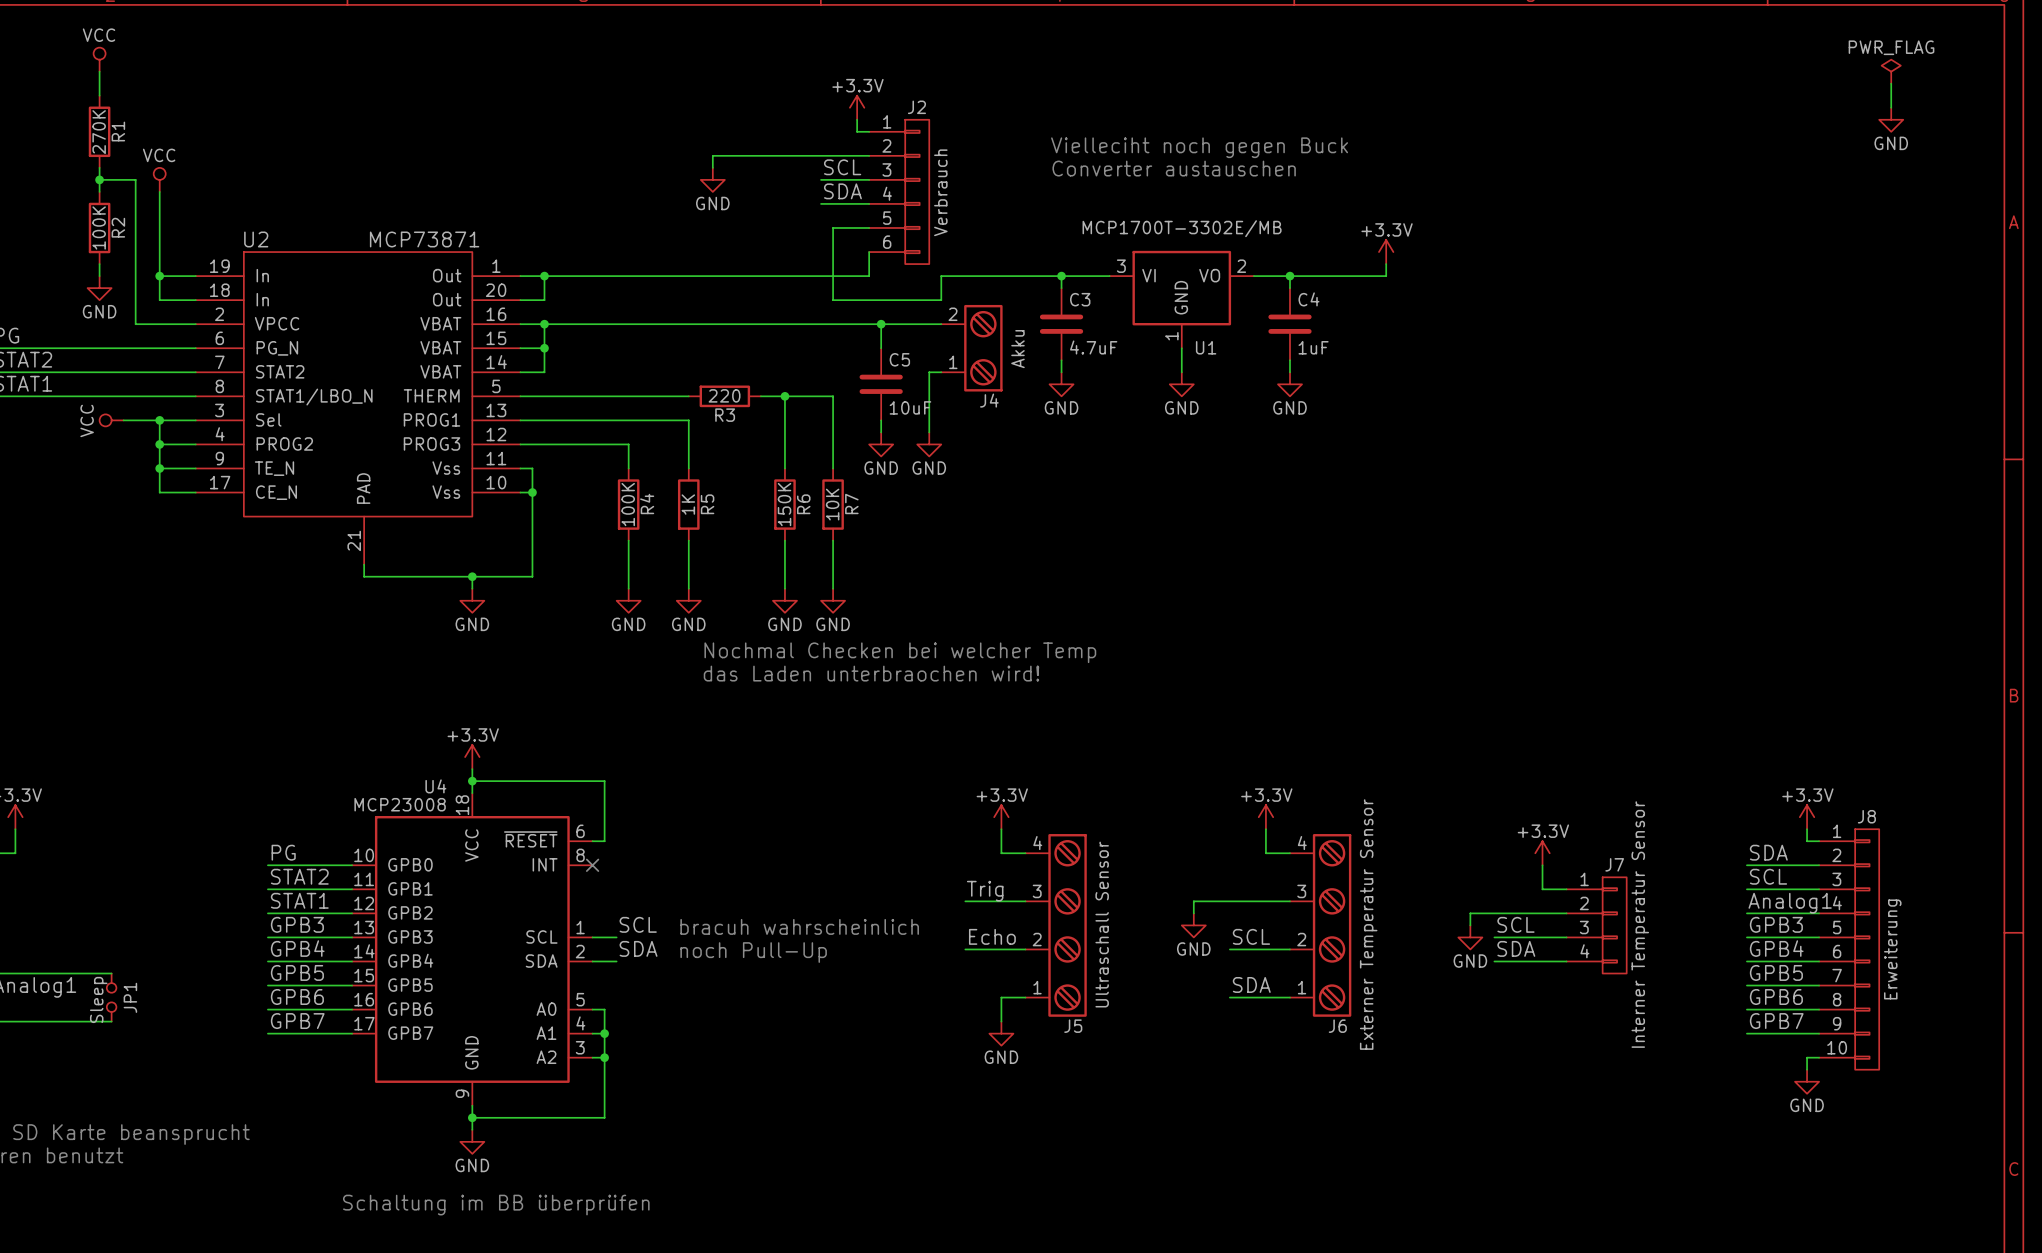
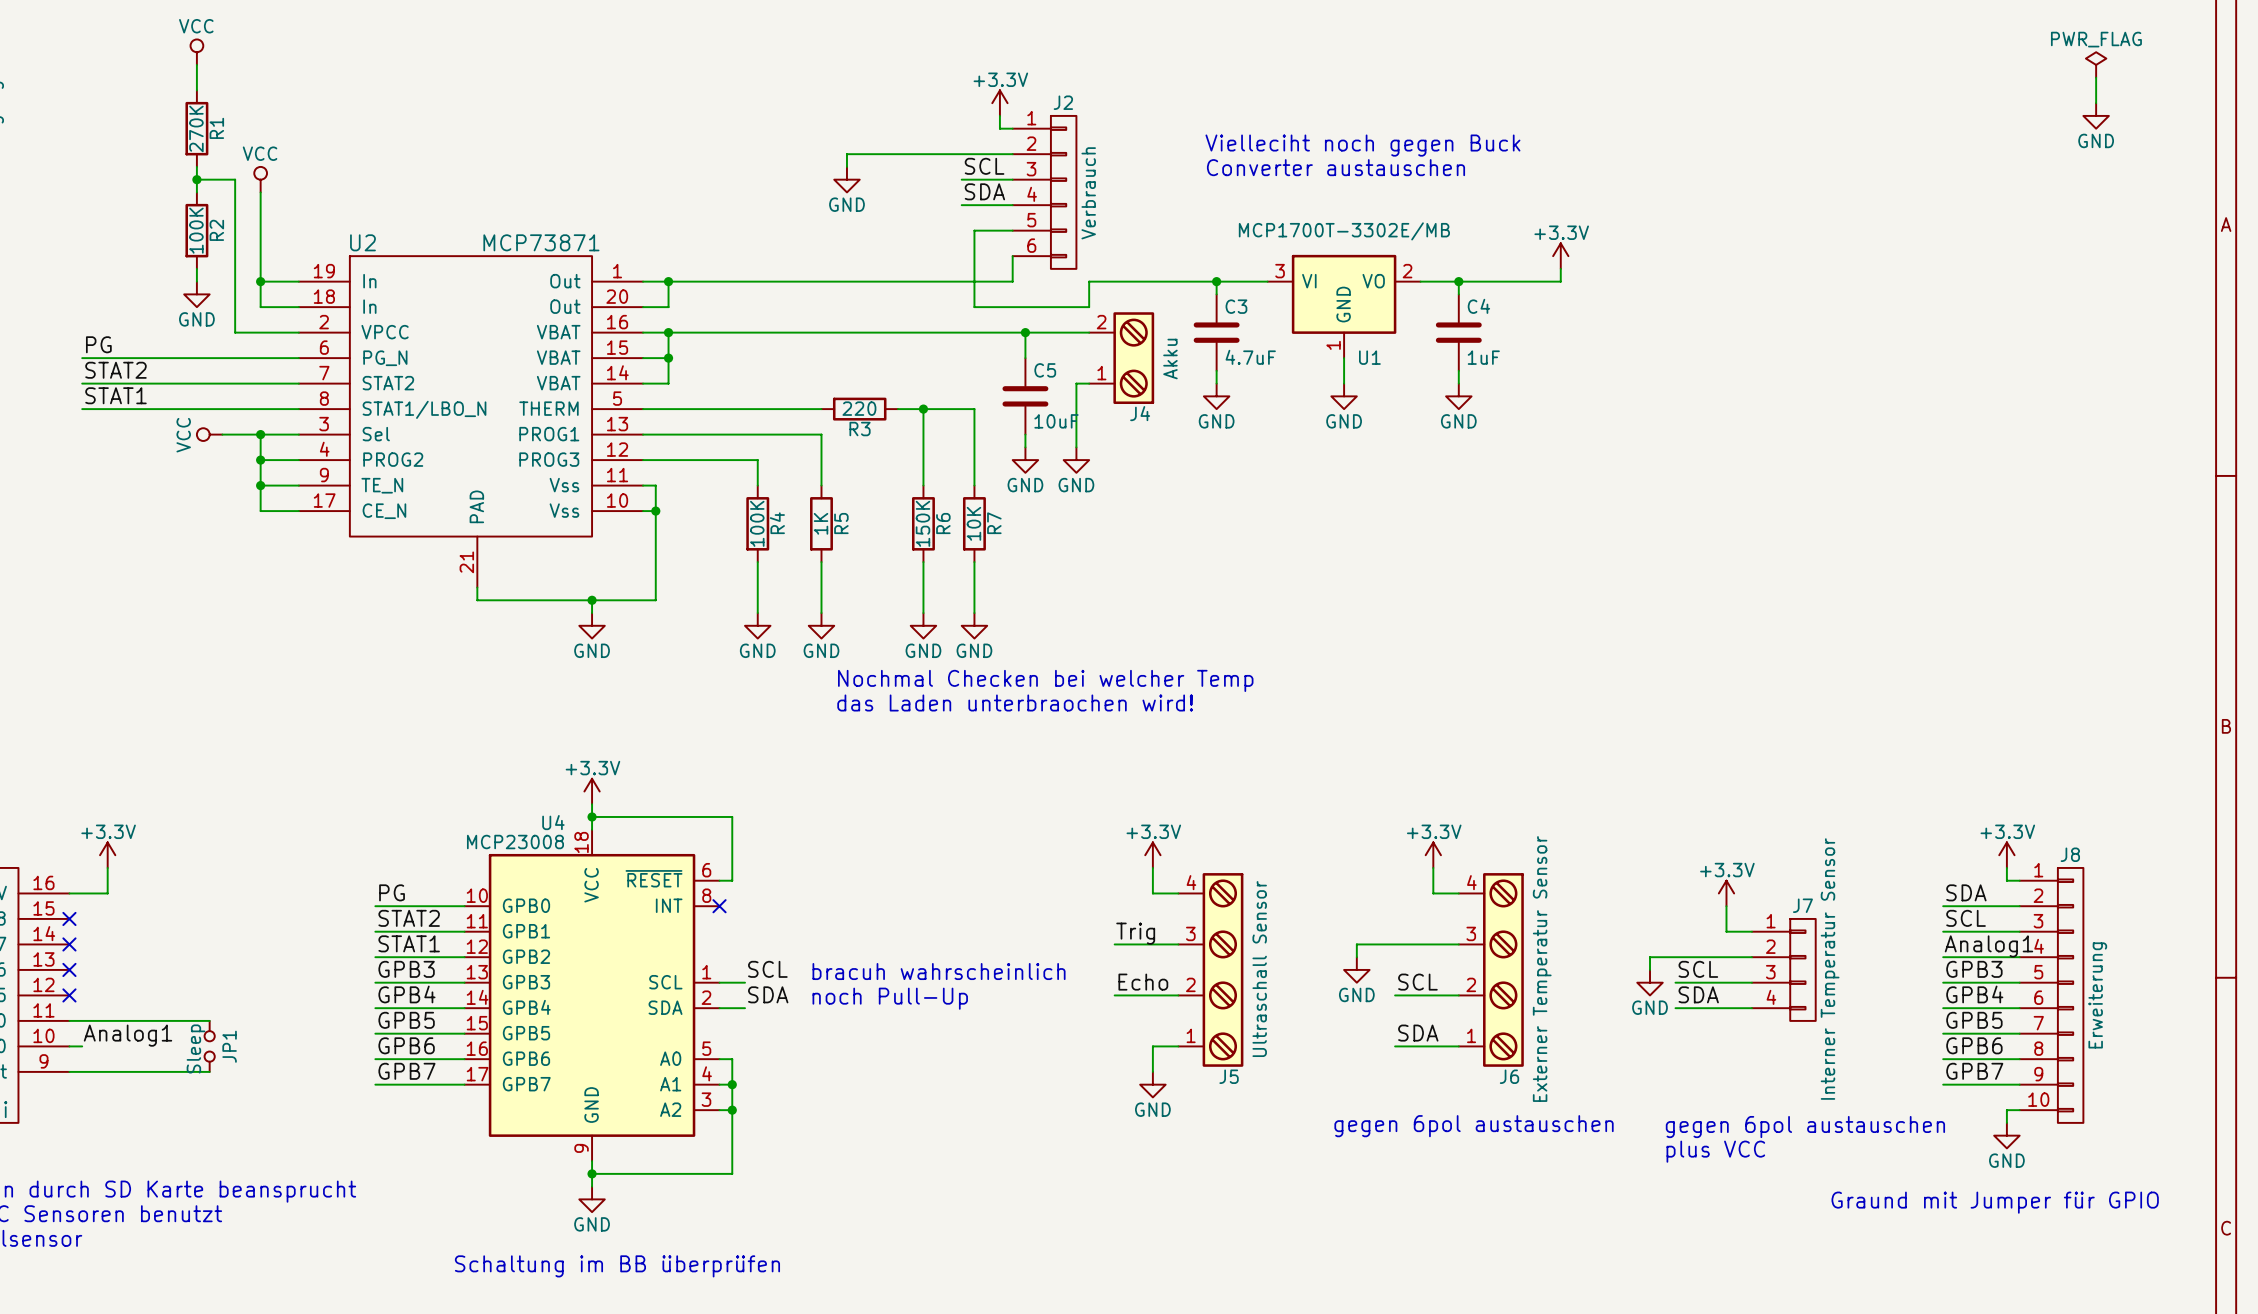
text: none -> gegen 6pol austauschen (1474, 1126)
text: none -> gegen 6pol austauschen (1805, 1127)
text: none -> plus VCC (1715, 1151)
text: none -> Graund mit Jumper für GPIO (1995, 1202)

